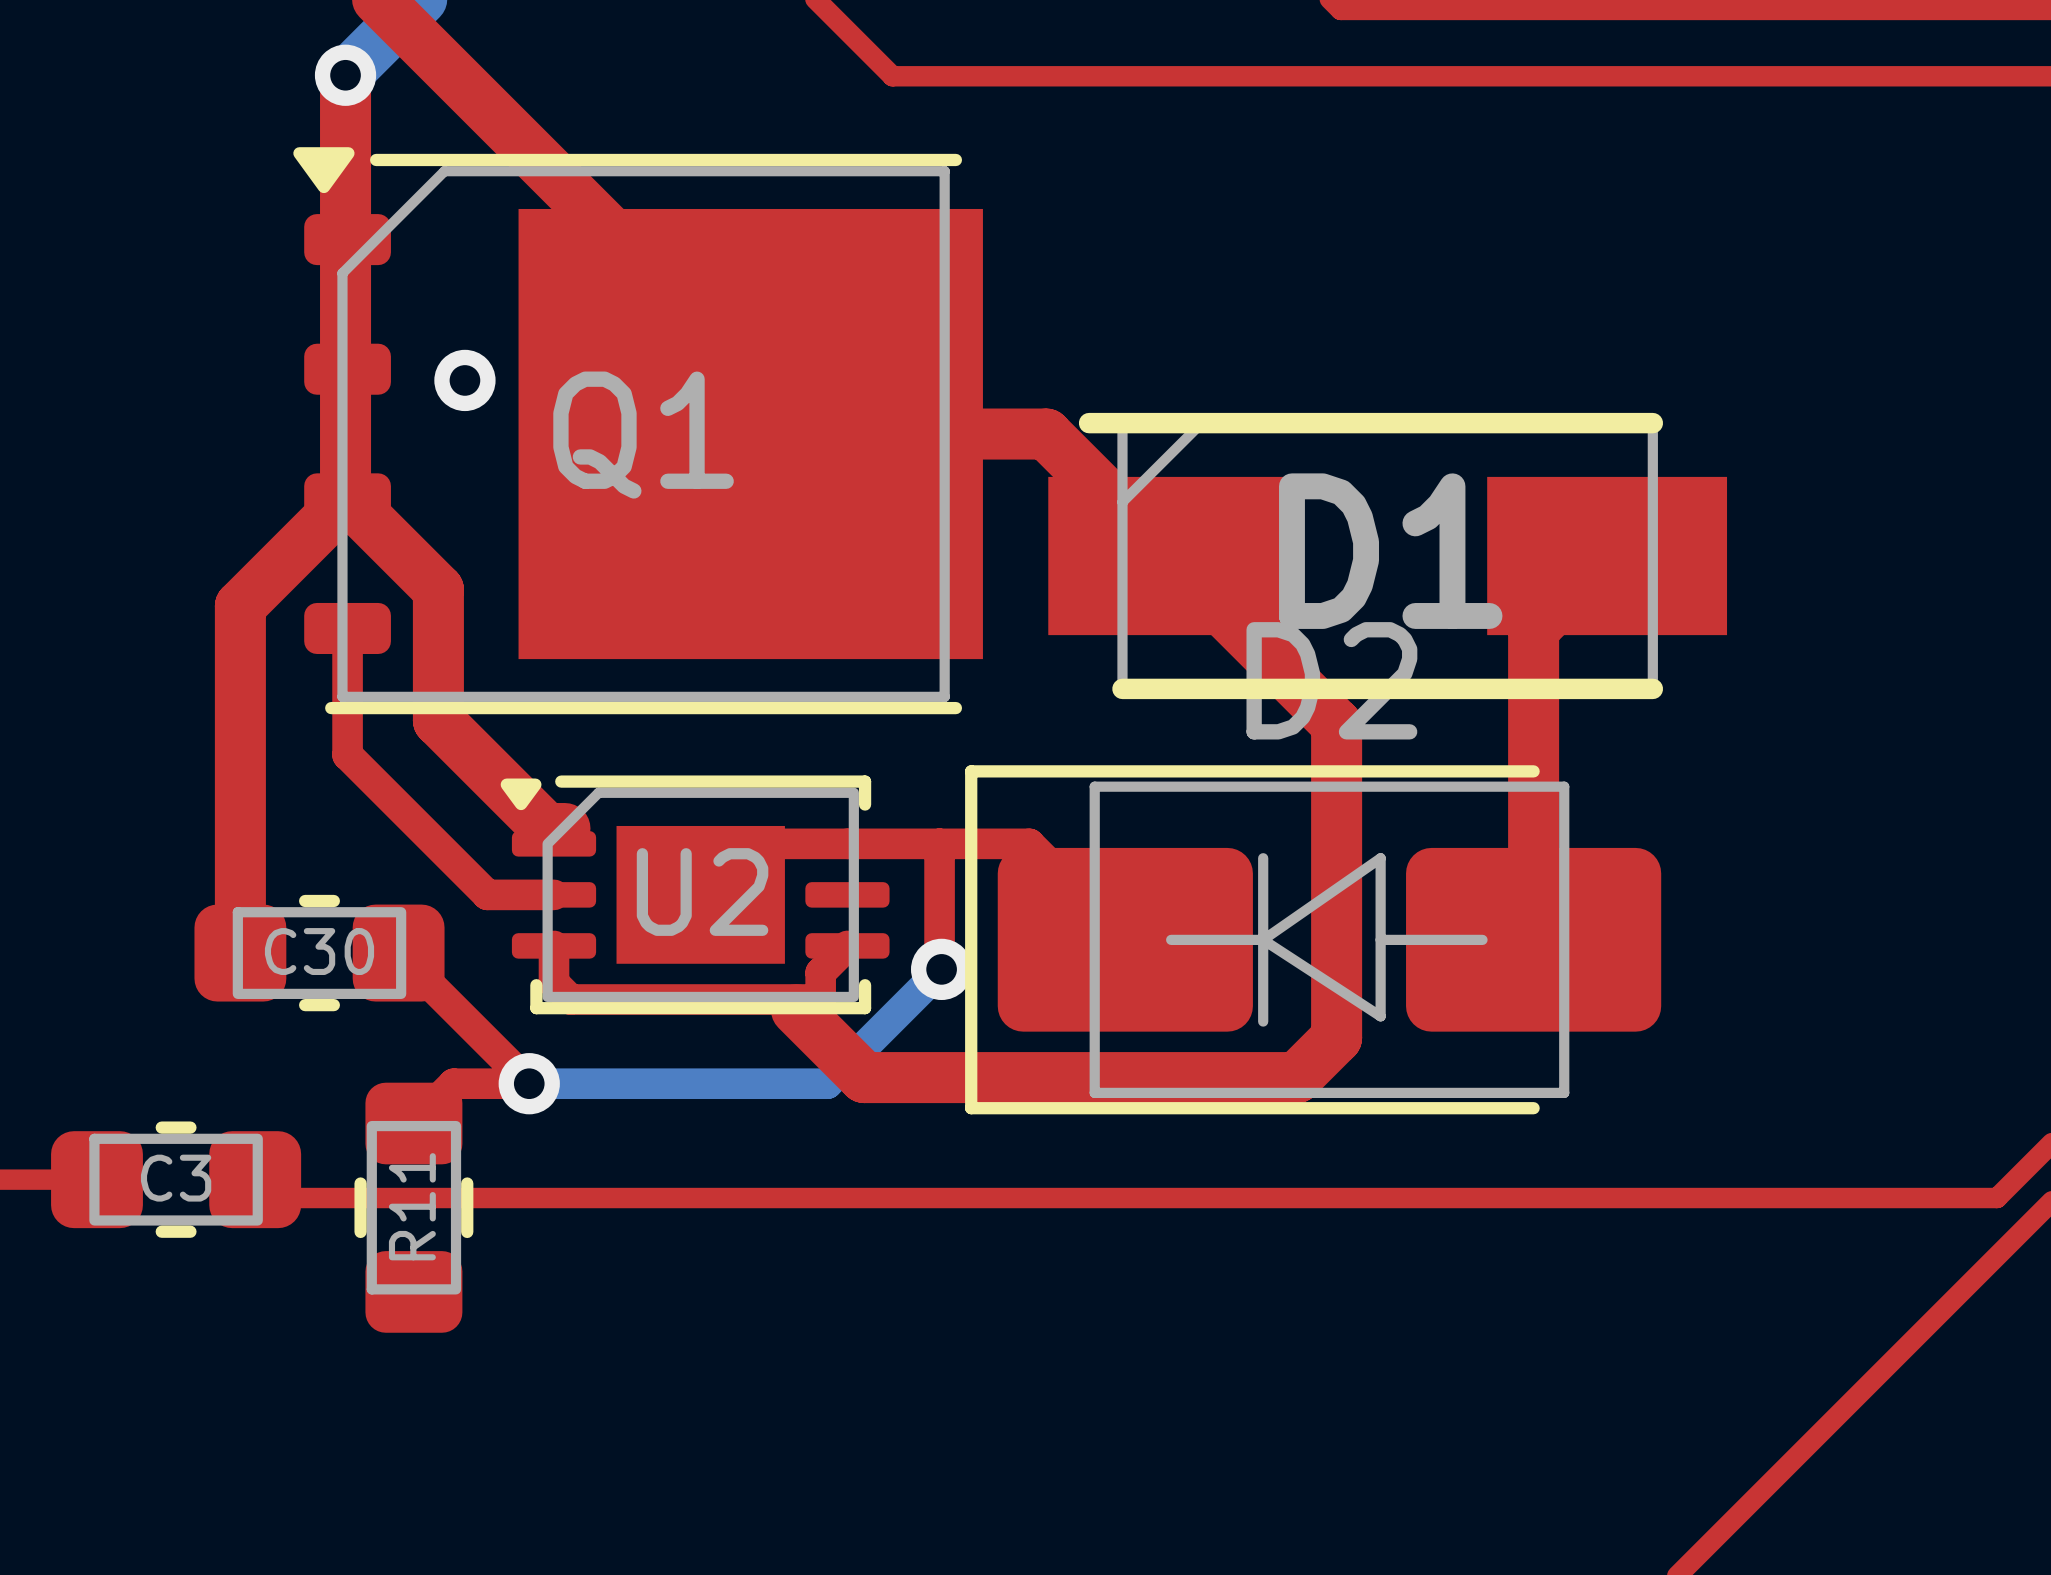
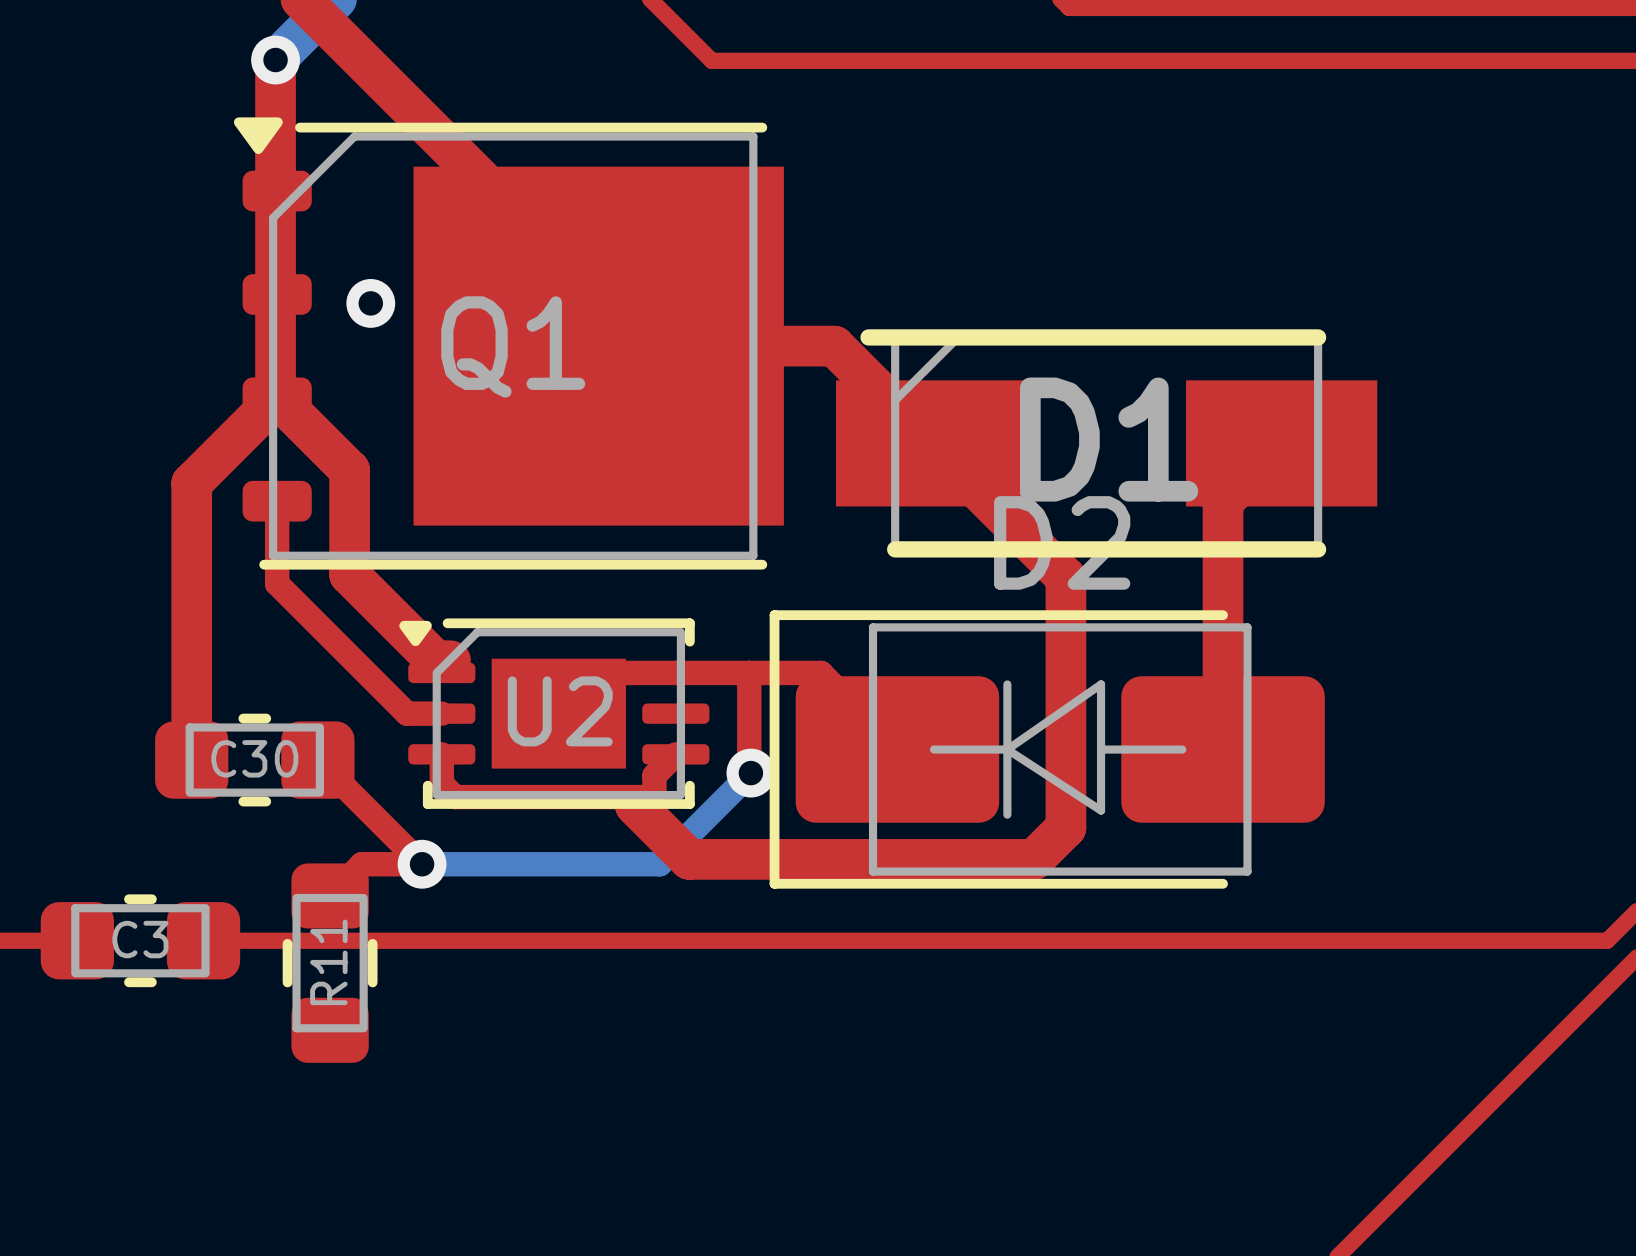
top track: (347, 732) (347, 755) (487, 894) (510, 894) -> (277, 583) (407, 713)
top track: (255, 1179) (273, 1198) (1997, 1198) (2015, 1179) -> (203, 940) (1607, 940)

